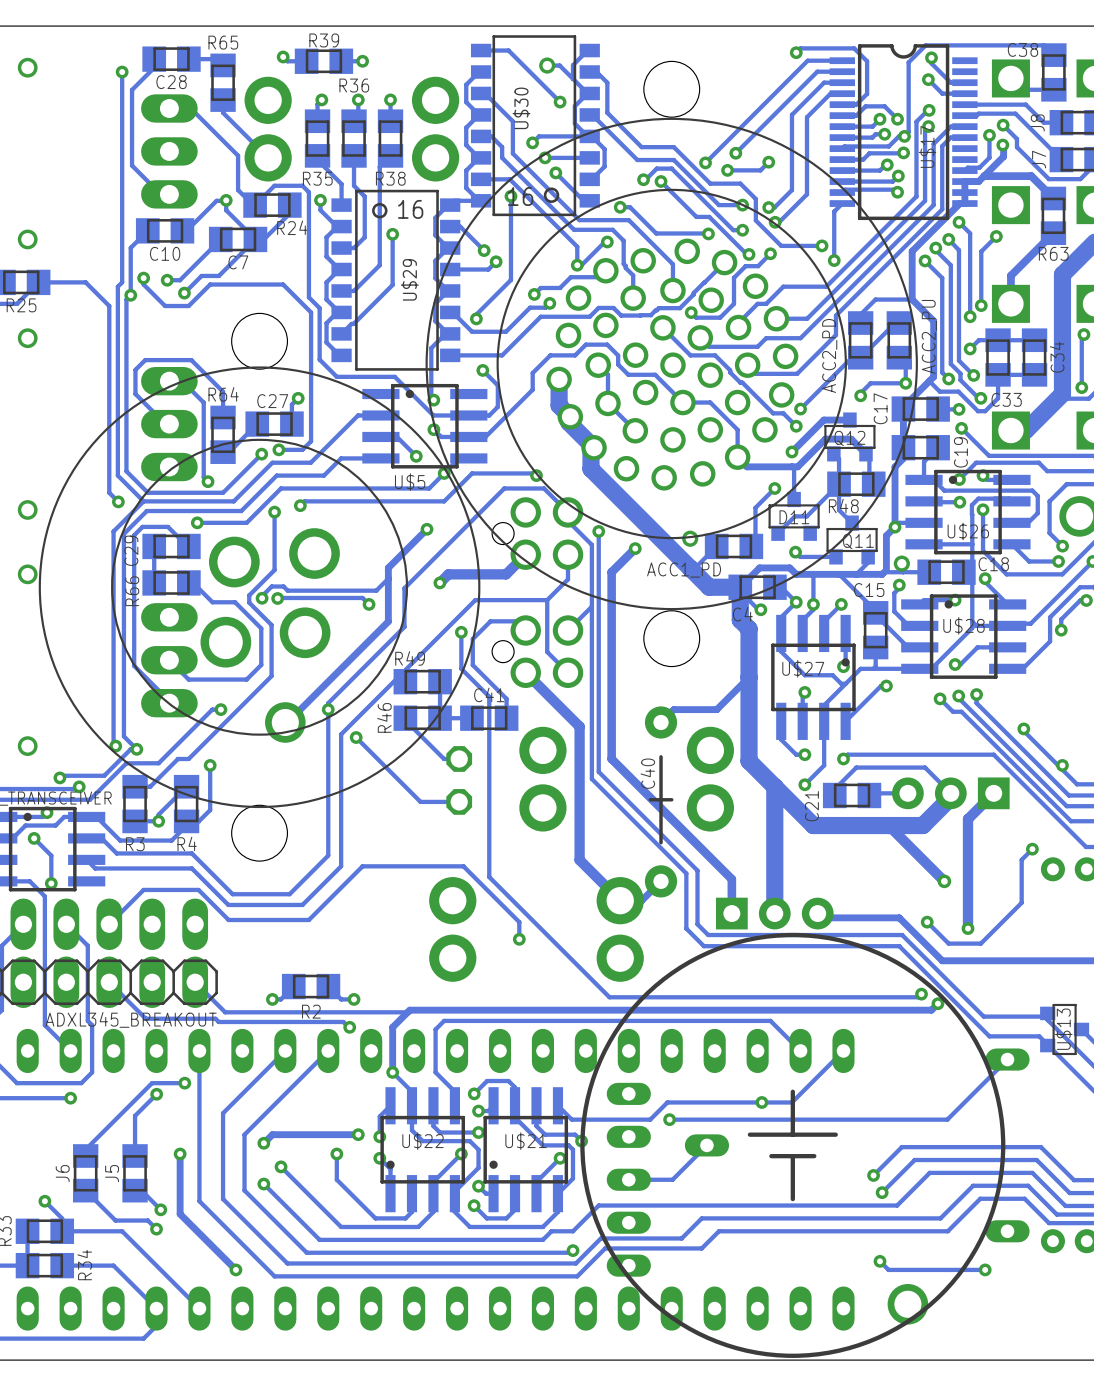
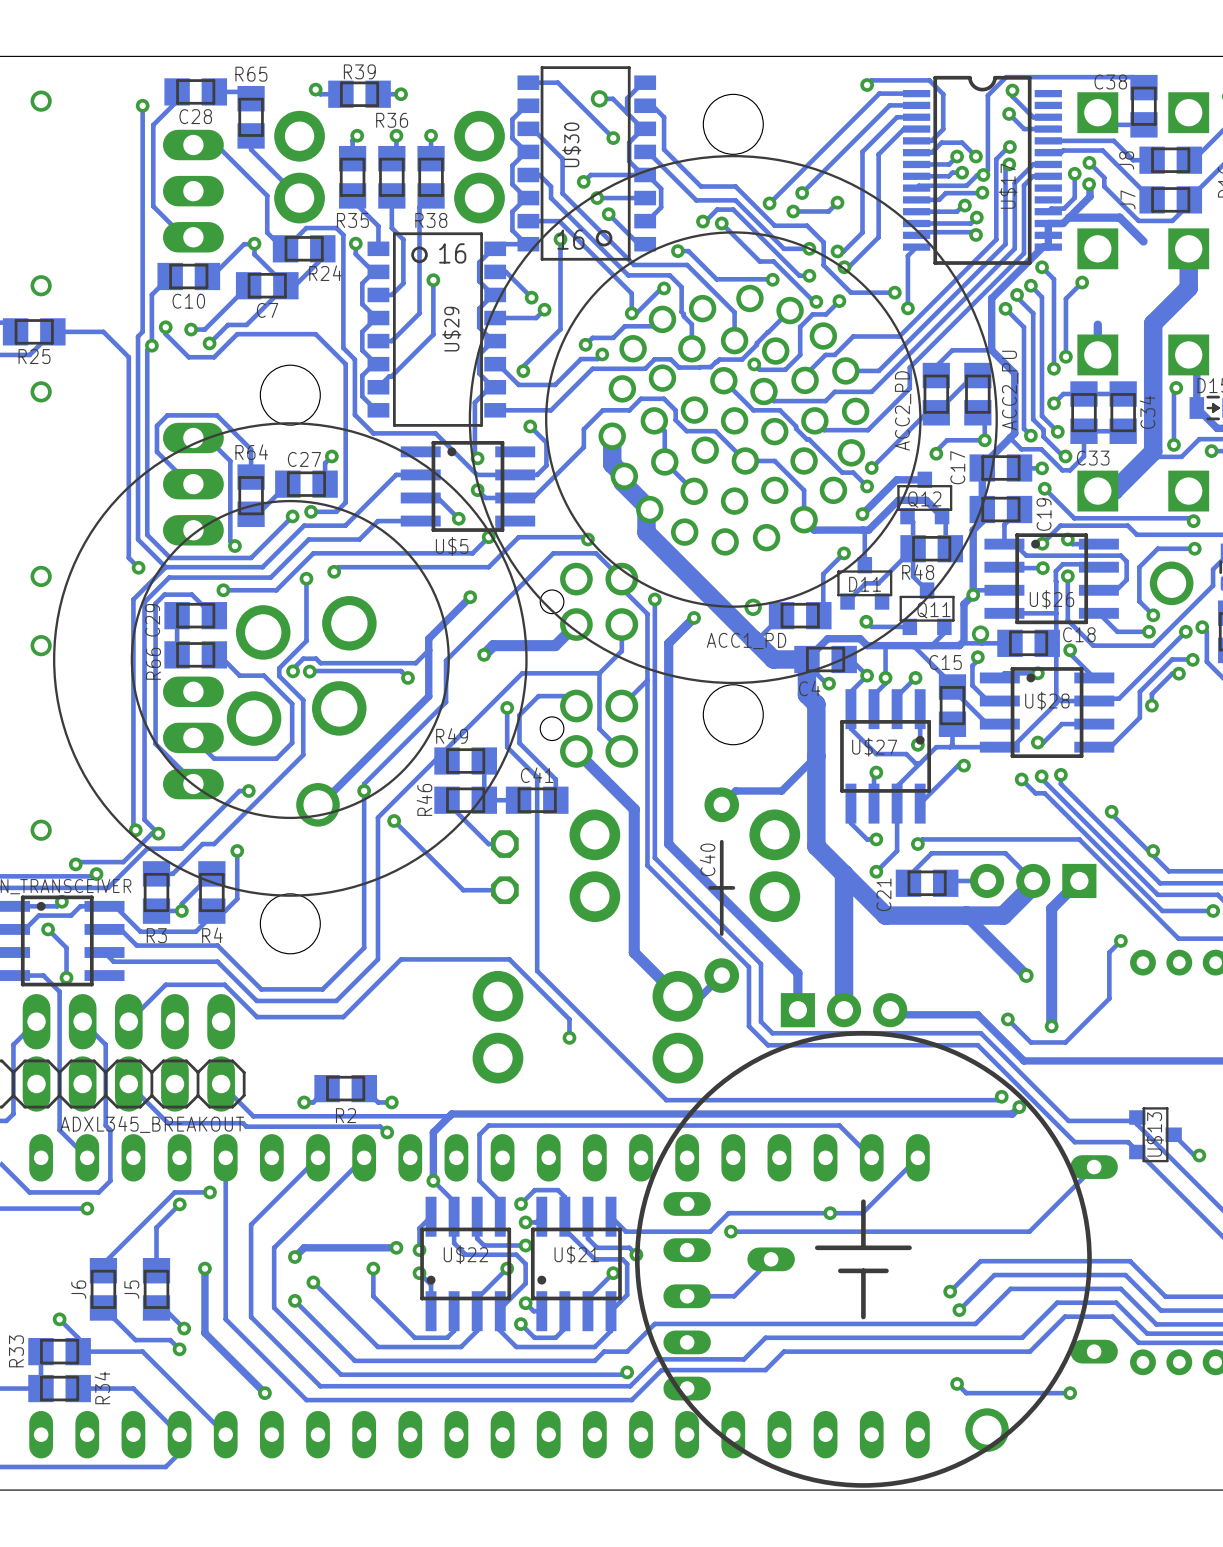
R63: (1053, 215) -> none
track: (1053, 233) (1010, 275) -> none

